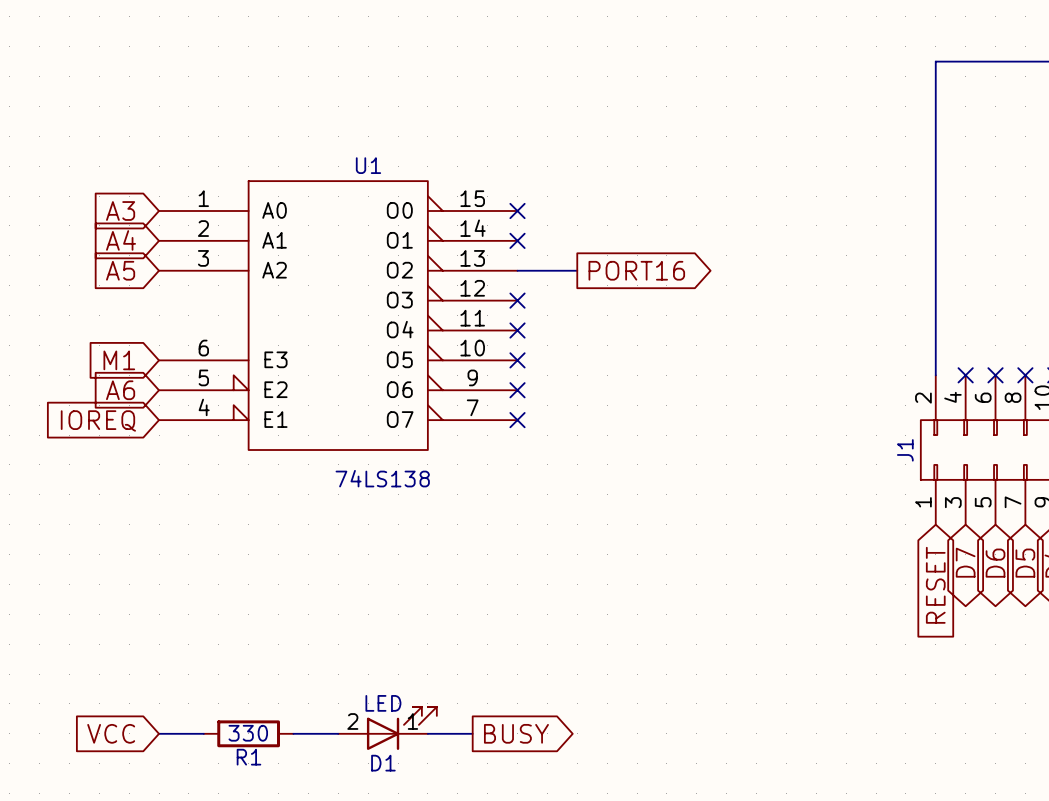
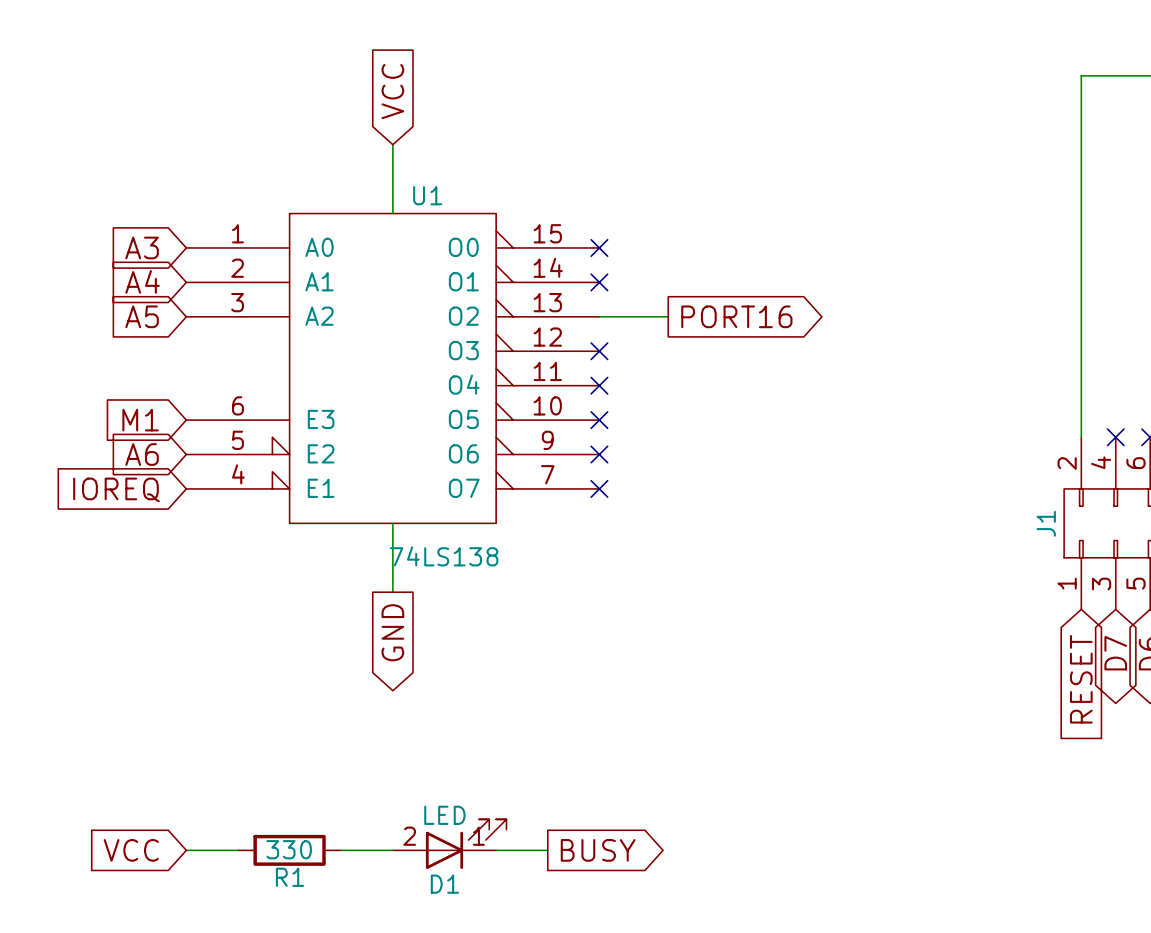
global label: none -> VCC (392, 91)
wire: none -> (392, 144) (392, 213)
wire: none -> (392, 523) (392, 592)
global label: none -> GND (392, 632)

